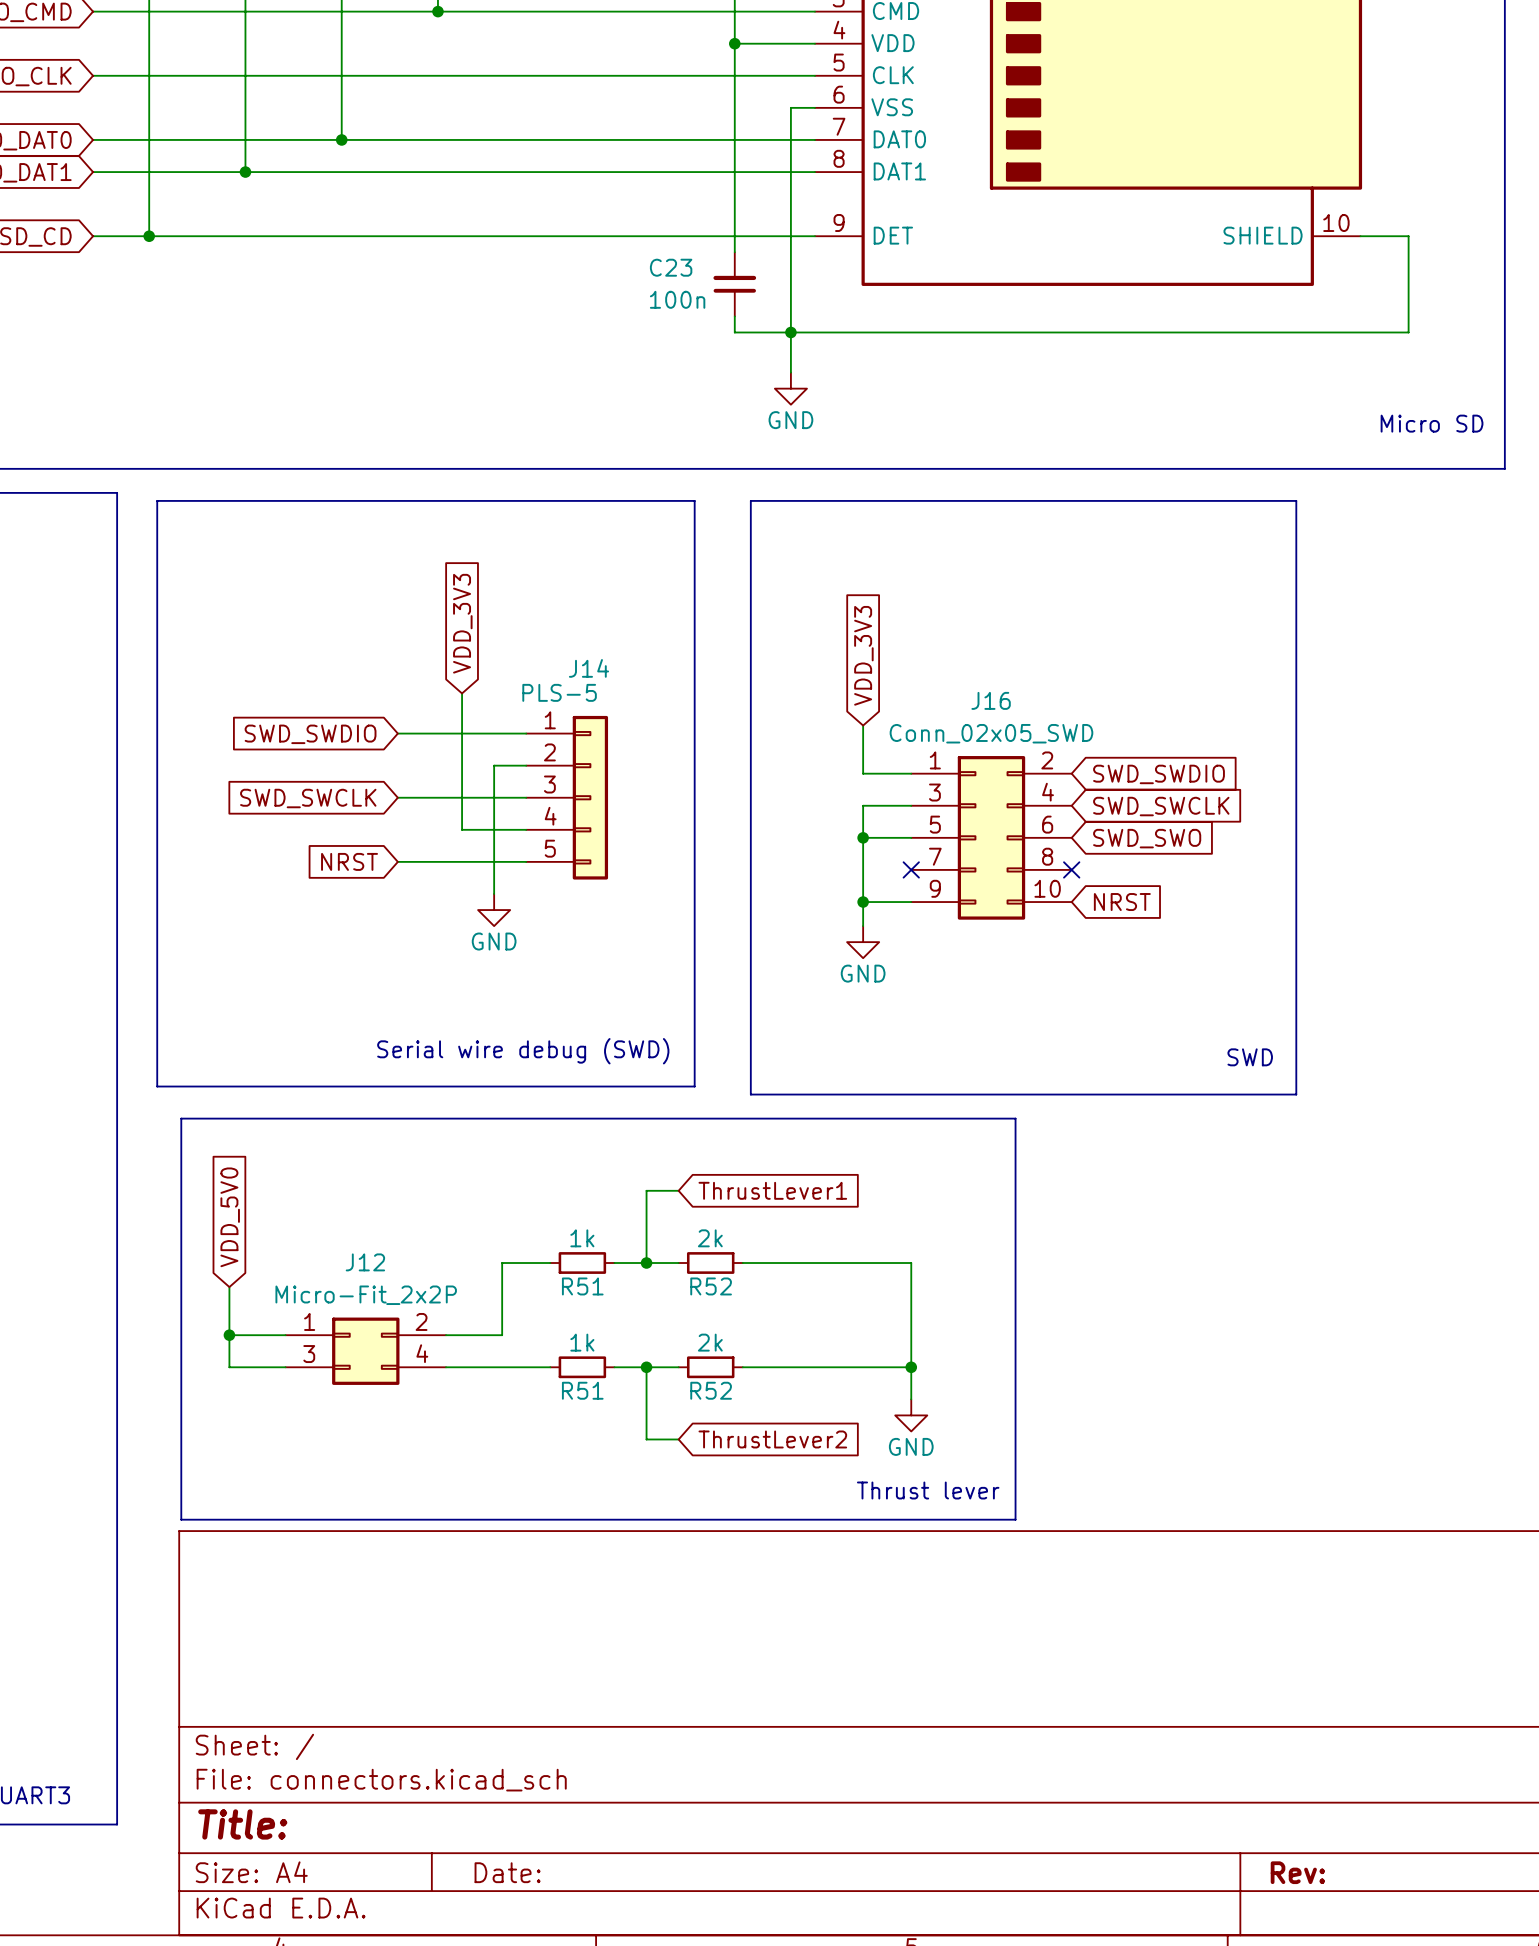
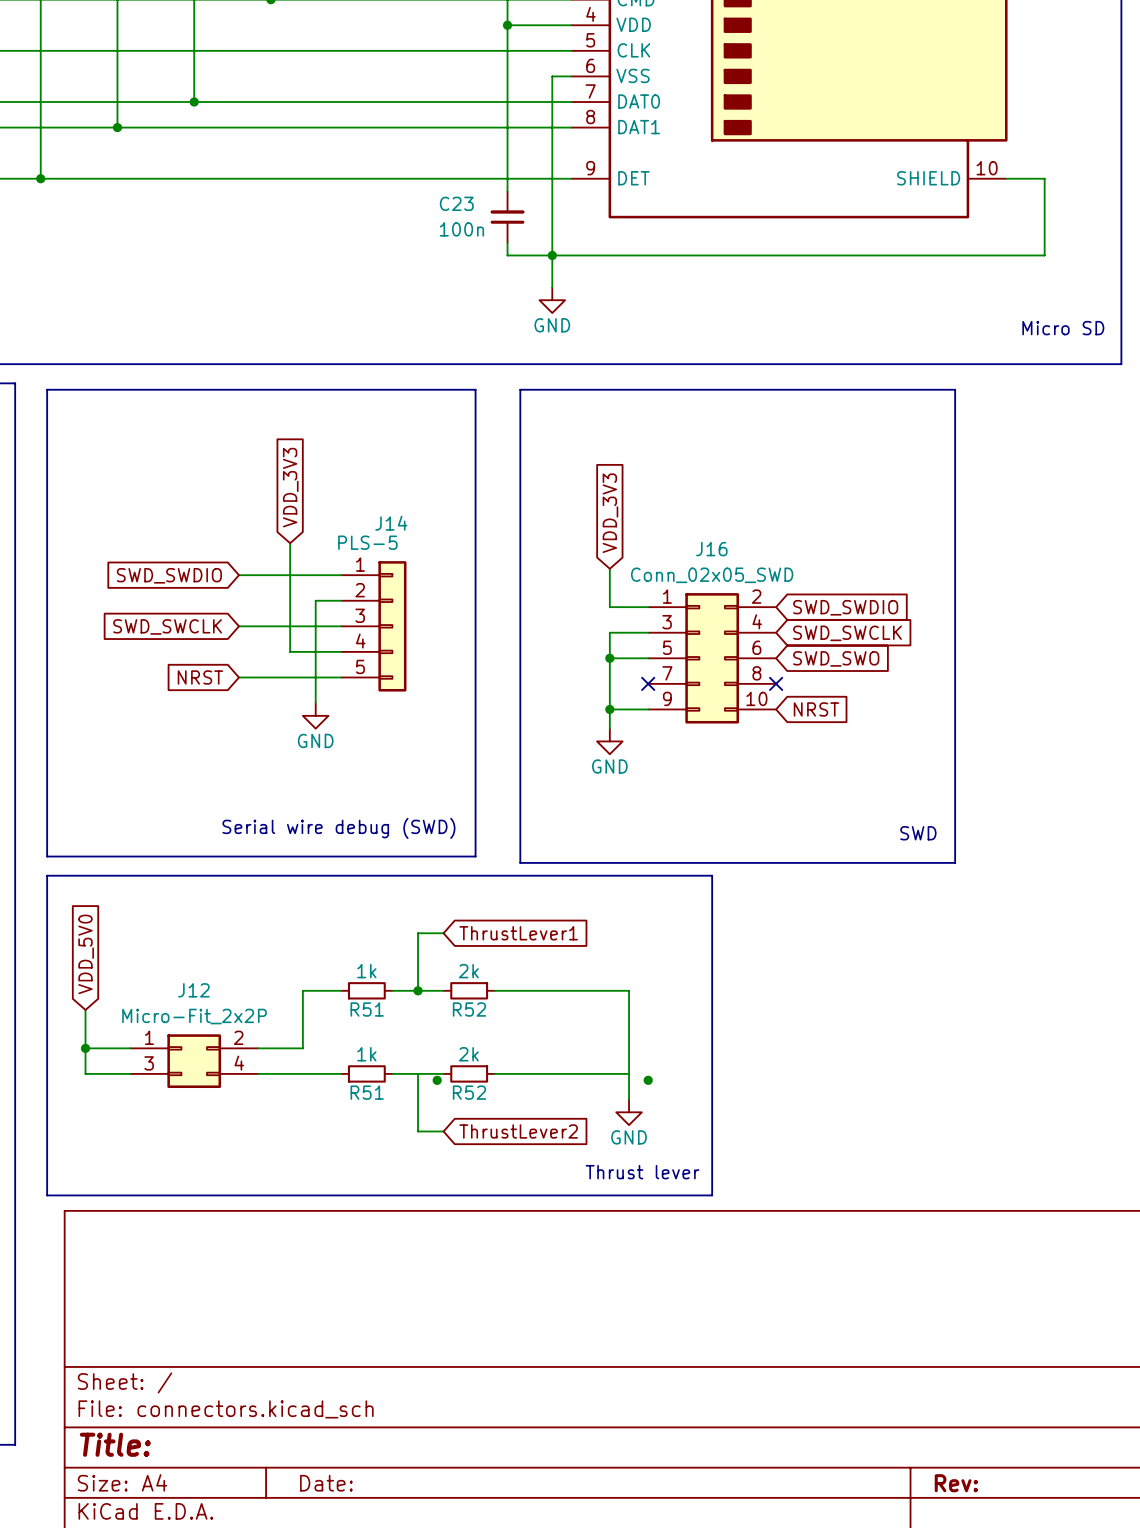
line: (181, 1118) (181, 1519) (1015, 1519) (1015, 1118) (181, 1118) -> (47, 875) (47, 1195) (712, 1195) (712, 875) (47, 875)
wire: (678, 1190) (646, 1190) (646, 1263) -> (443, 933) (418, 933) (418, 990)
global label position: ThrustLever1 (772, 1190) -> ThrustLever1 (518, 933)
global label position: VDD_5V0 (230, 1217) -> VDD_5V0 (86, 954)
wire: (550, 1263) (502, 1263) (502, 1335) (446, 1335) -> (341, 990) (302, 990) (302, 1048) (258, 1048)
R51 position: (582, 1263) -> (366, 990)
wire: (614, 1263) (678, 1263) -> (392, 990) (443, 990)
junction position: (646, 1263) -> (418, 990)
R52 position: (710, 1263) -> (469, 990)
wire: (742, 1263) (911, 1263) (911, 1399) -> (494, 990) (629, 990) (629, 1099)
wire: (229, 1287) (229, 1367) (285, 1367) -> (85, 1009) (85, 1073) (130, 1073)
wire: (229, 1335) (285, 1335) -> (85, 1048) (130, 1048)
junction position: (229, 1335) -> (85, 1048)
J12 position: (365, 1351) -> (194, 1061)
wire: (446, 1367) (550, 1367) -> (258, 1073) (341, 1073)
R51 position: (582, 1367) -> (366, 1073)
wire: (614, 1367) (678, 1367) -> (392, 1073) (443, 1073)
wire: (646, 1367) (646, 1439) (678, 1439) -> (418, 1073) (418, 1131) (443, 1131)
R52 position: (710, 1367) -> (469, 1073)
wire: (742, 1367) (911, 1367) -> (494, 1073) (629, 1073)
power symbol position: GND (911, 1415) -> GND (629, 1112)
global label position: ThrustLever2 (772, 1439) -> ThrustLever2 (518, 1131)
text position: Thrust lever (928, 1490) -> Thrust lever (642, 1172)

